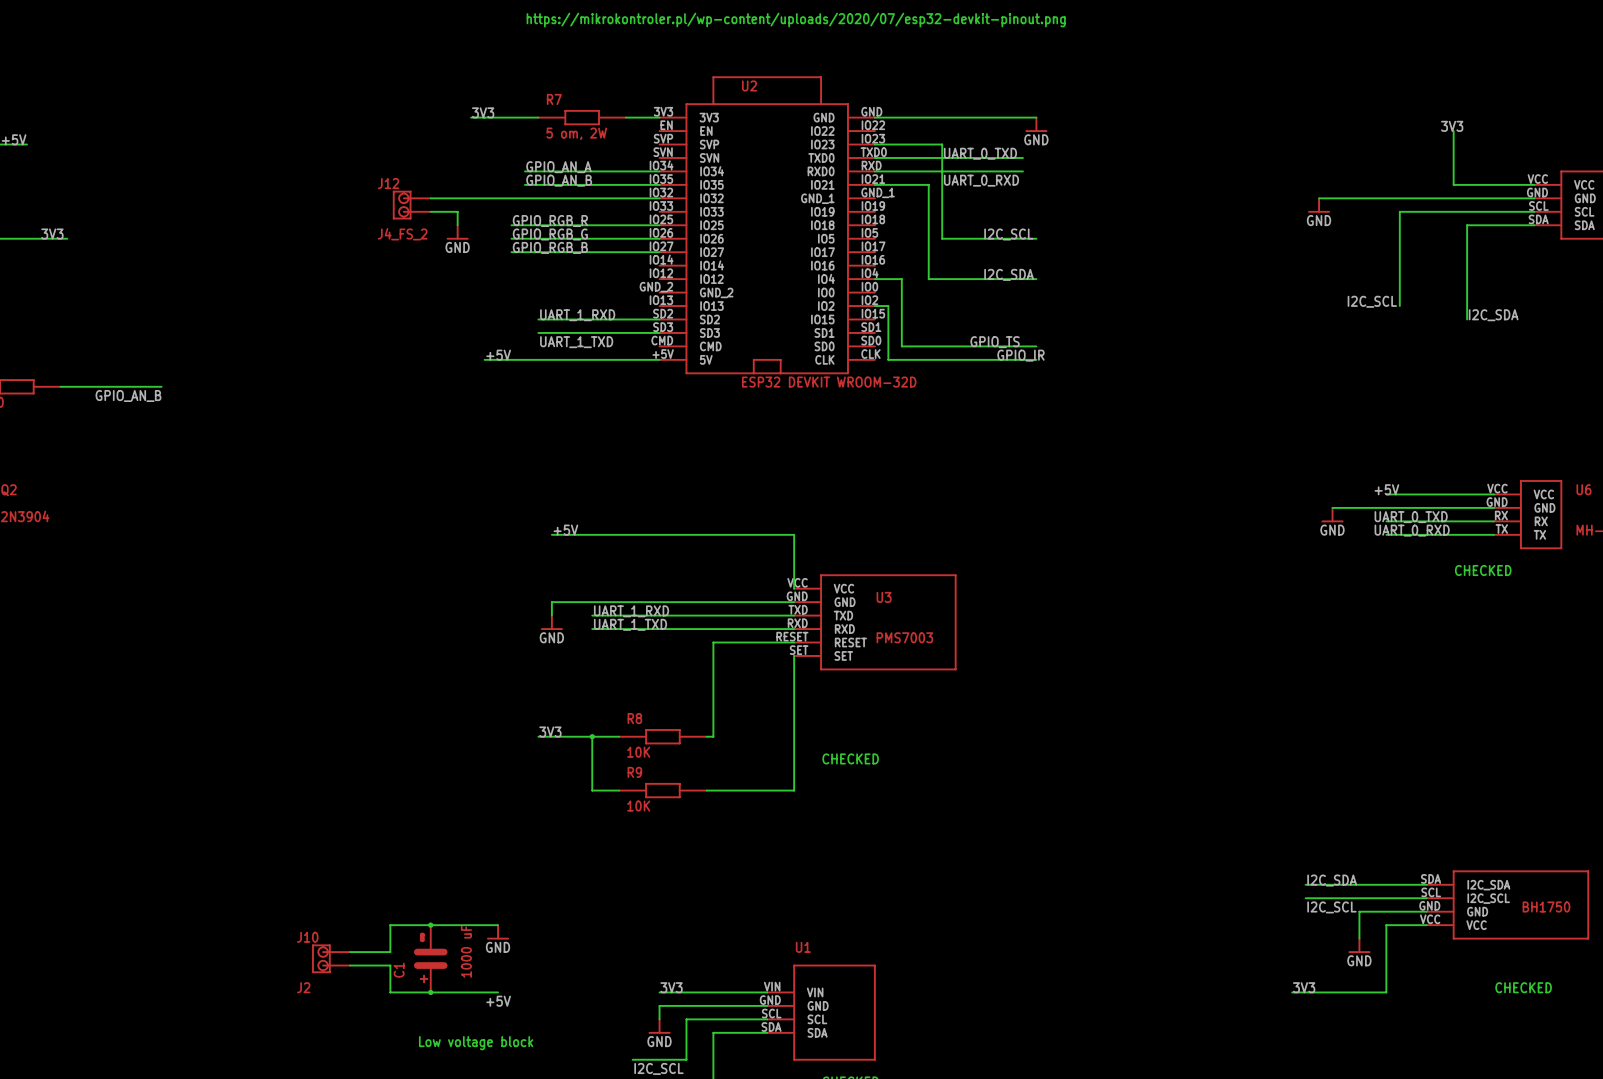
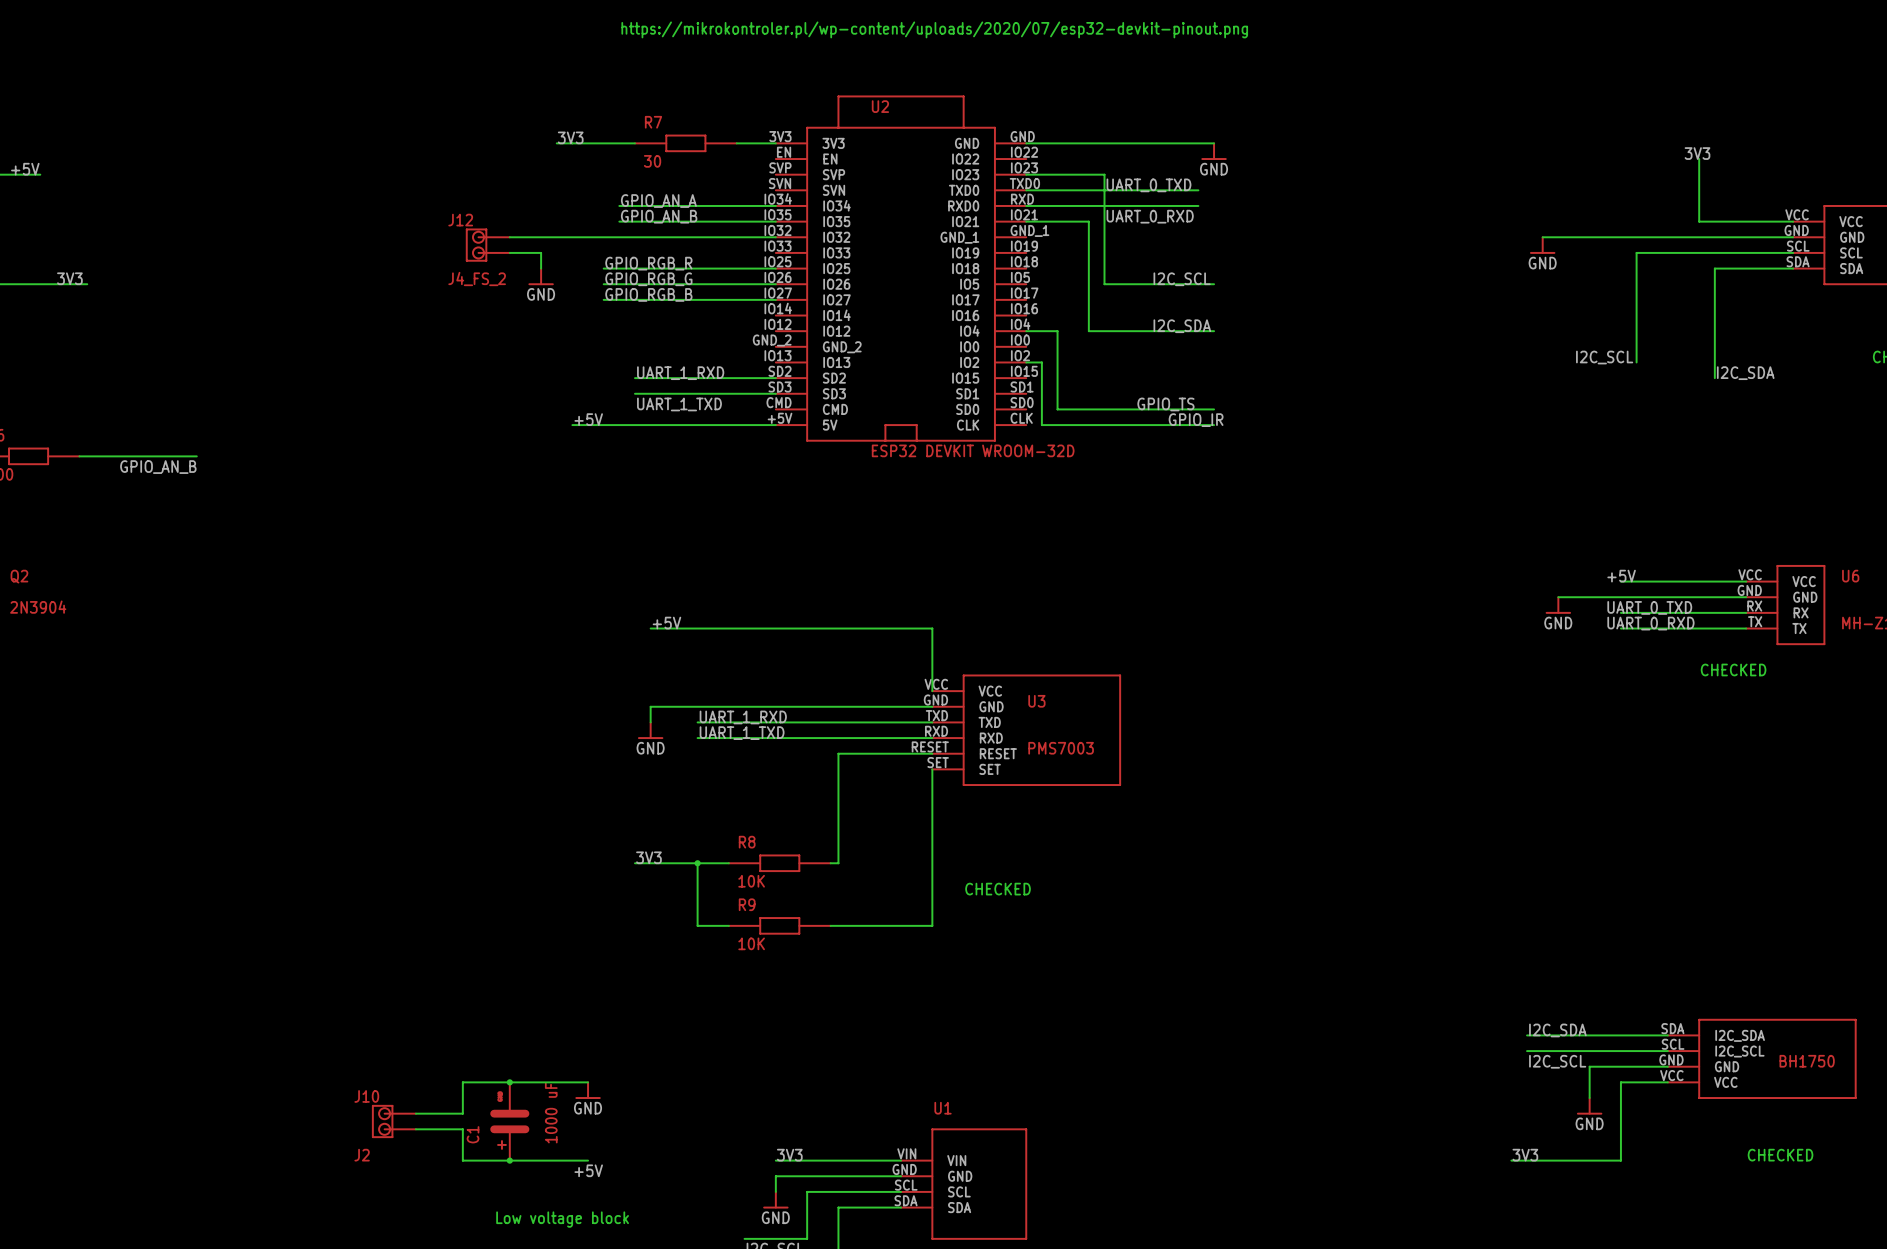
R7 value: 5 om, 2W (576, 133) -> 30 (652, 161)

